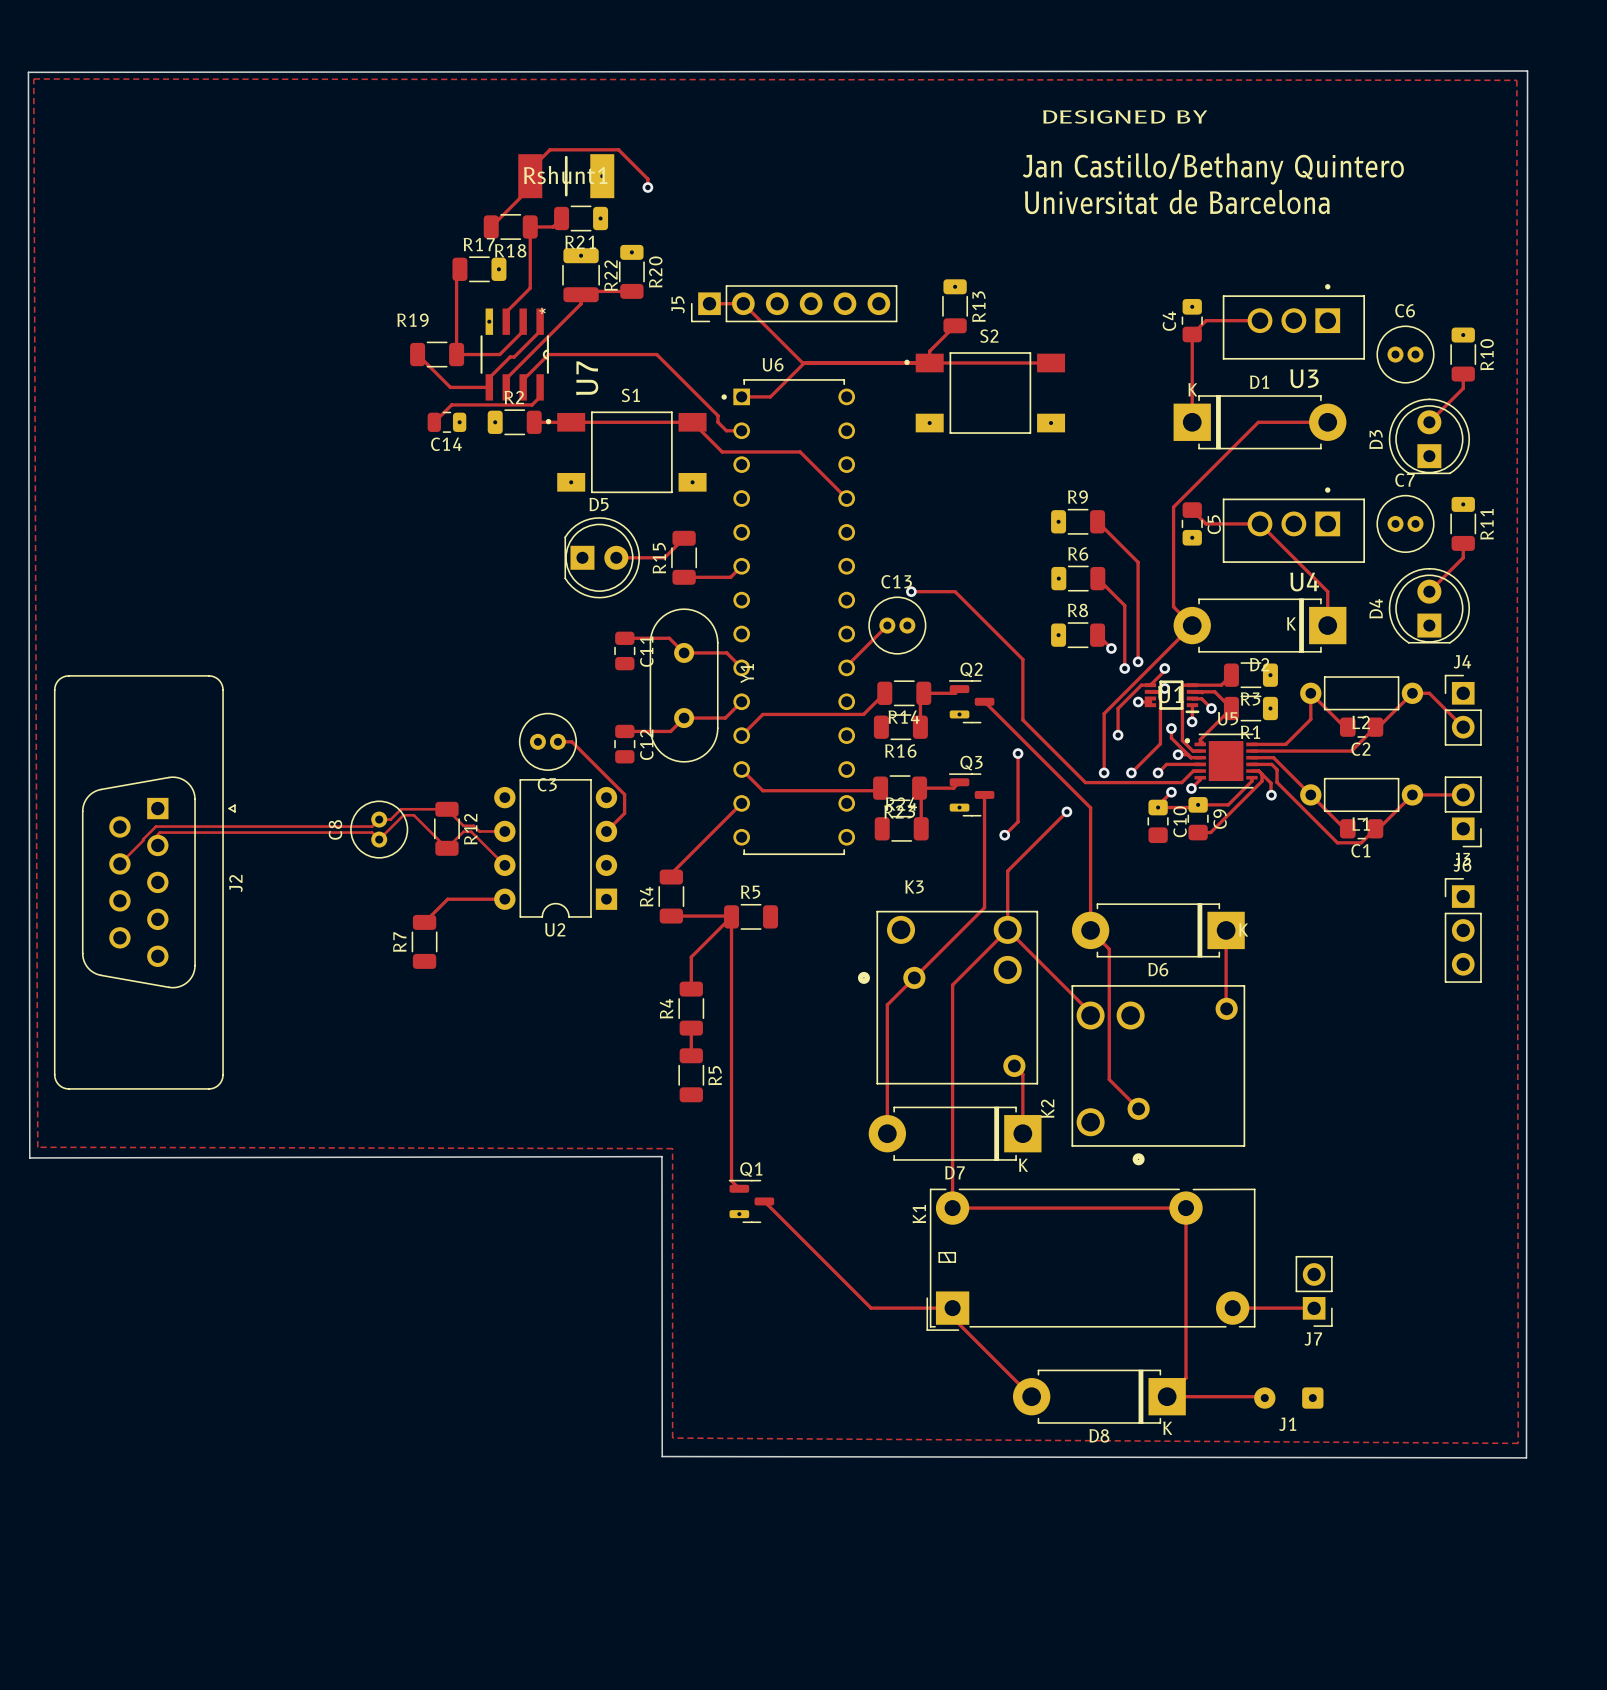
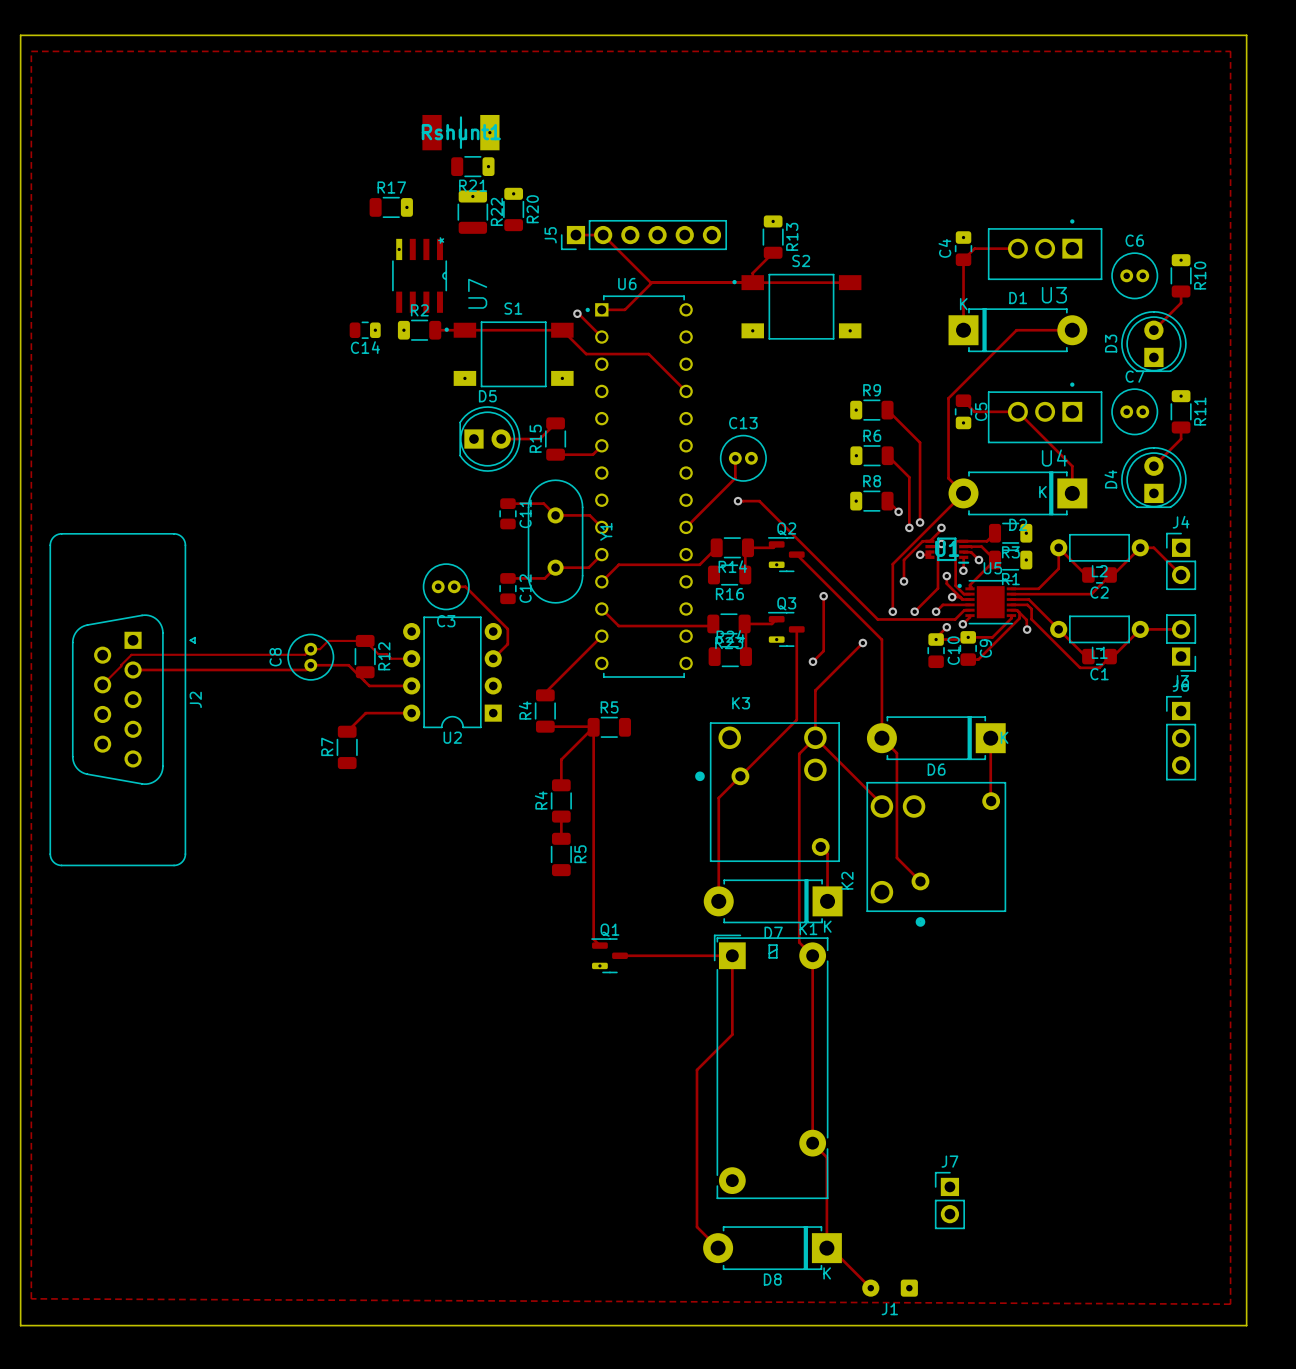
board edge: (1527, 70) (28, 72) (29, 1157) (661, 1156) (662, 1456) (1526, 1457) (1527, 70) -> (20, 35) (20, 1325) (1246, 1325) (1246, 35) (20, 35)
zone outline: (33, 79) (1516, 80) (1518, 1443) (672, 1438) (672, 1148) (37, 1147) (33, 79) -> (31, 51) (31, 1298) (1230, 1304) (1230, 51) (31, 51)
text: DESIGNED BY (1125, 116) -> none
text: Jan Castillo/Bethany Quintero (1213, 168) -> none
track: (647, 187) (647, 179) (618, 149) (550, 149) (530, 169) (530, 187) (491, 226) -> none
via: (647, 187) -> none
text: Universitat de Barcelona (1177, 201) -> none
track: (561, 218) (553, 226) (530, 226) (530, 288) (506, 312) (506, 321) -> none
R18: (510, 226) -> none
track: (459, 269) (456, 272) (456, 354) (499, 354) (523, 331) (523, 321) -> none
track: (631, 291) (584, 291) (581, 294) (581, 303) (506, 378) (506, 387) -> none
track: (540, 321) (540, 331) (514, 356) (510, 356) (489, 377) (489, 387) (450, 387) (417, 354) (417, 359) -> none
R19: (437, 354) -> none
track: (523, 387) (523, 379) (548, 354) (656, 354) (717, 415) (717, 422) (726, 430) (741, 430) -> (577, 313) (601, 337)
track: (540, 387) (540, 396) (532, 404) (451, 404) (434, 422) -> none
via: none -> (577, 313)
track: (911, 591) (955, 591) (1022, 659) (1022, 719) -> (738, 501) (759, 501) (827, 569)
via position: (911, 591) -> (738, 501)
track: (887, 625) (846, 667) -> (735, 458) (735, 478) (686, 527)
C13 position: (897, 625) -> (743, 458)
track: (157, 845) (157, 834) (159, 832) (372, 832) (379, 839) (403, 815) (413, 815) (446, 848) (463, 831) (471, 831) (504, 865) -> (133, 669) (306, 669) (310, 665) (348, 665) (369, 685) (411, 685)
track: (987, 949) (952, 985) (952, 1208) (1186, 1208) (1186, 1377) (1167, 1396) (1264, 1398) -> (799, 753) (799, 942) (812, 955) (812, 1143) (826, 1157) (826, 1248)
track: (764, 1201) (871, 1308) (952, 1308) (952, 1317) (1031, 1396) -> (620, 955) (732, 955) (732, 1034) (696, 1069) (696, 1227) (718, 1248)
K1 rotation: 0° (1090, 1259) -> 90° clockwise (771, 1066)
J7 rotation: 0° (1314, 1291) -> 180° (949, 1200)
J7 position: (1314, 1291) -> (949, 1200)
track: (1232, 1308) (1314, 1308) -> none
D8 position: (1099, 1396) -> (772, 1248)
J1 position: (1288, 1398) -> (890, 1288)
track: none -> (826, 1248) (830, 1248) (870, 1288)

